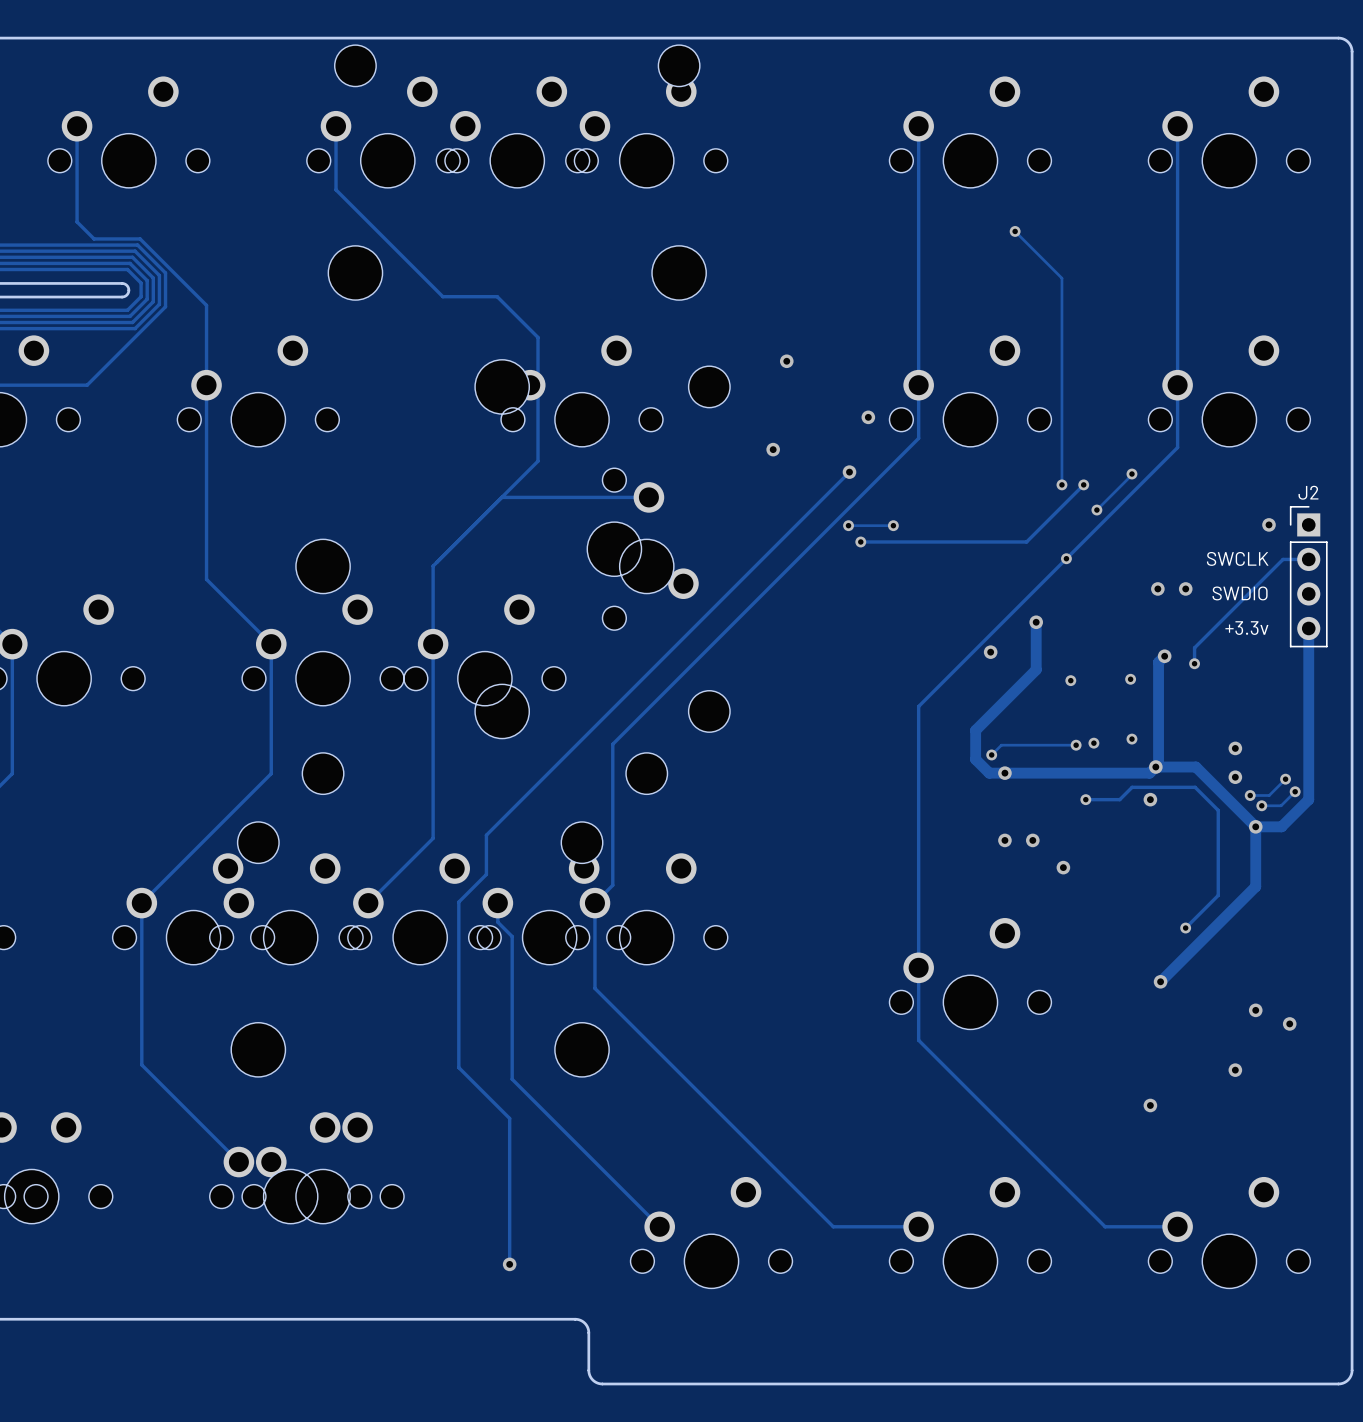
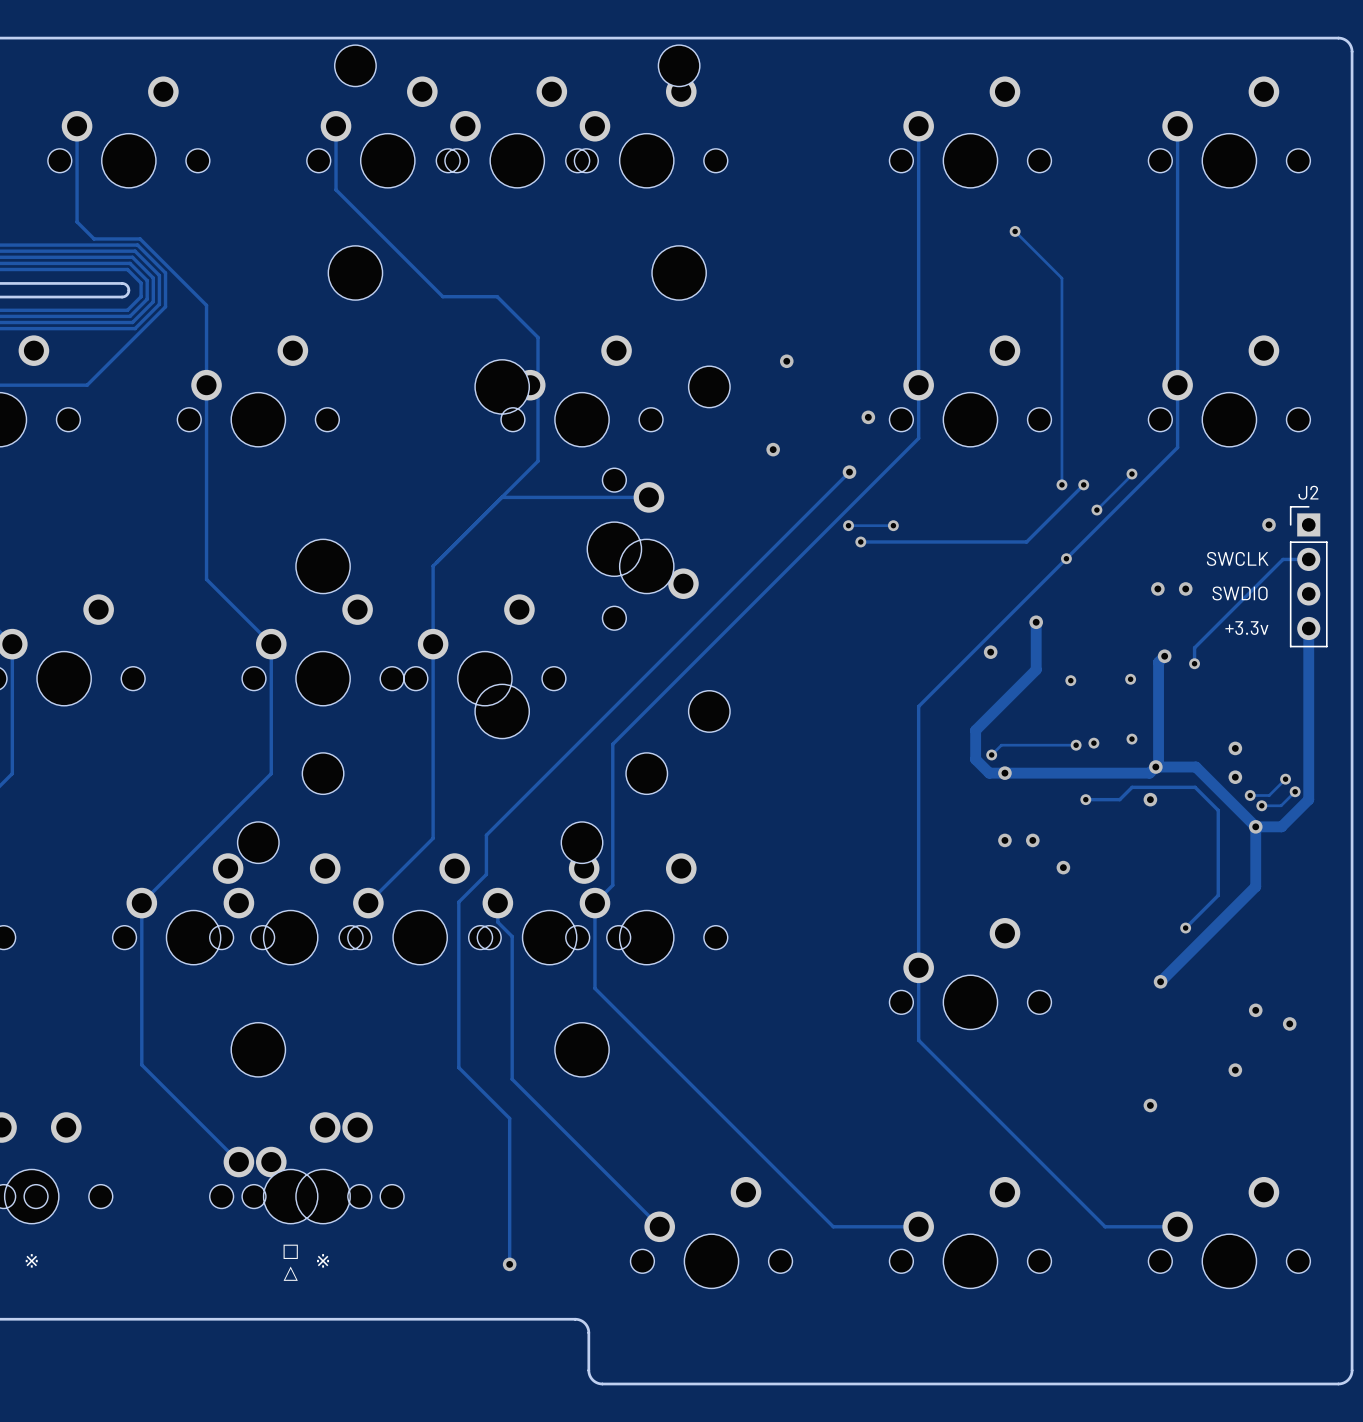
text: none -> □ (290, 1251)
text: none -> ※ (31, 1260)
text: none -> ※ (323, 1260)
text: none -> △ (290, 1273)

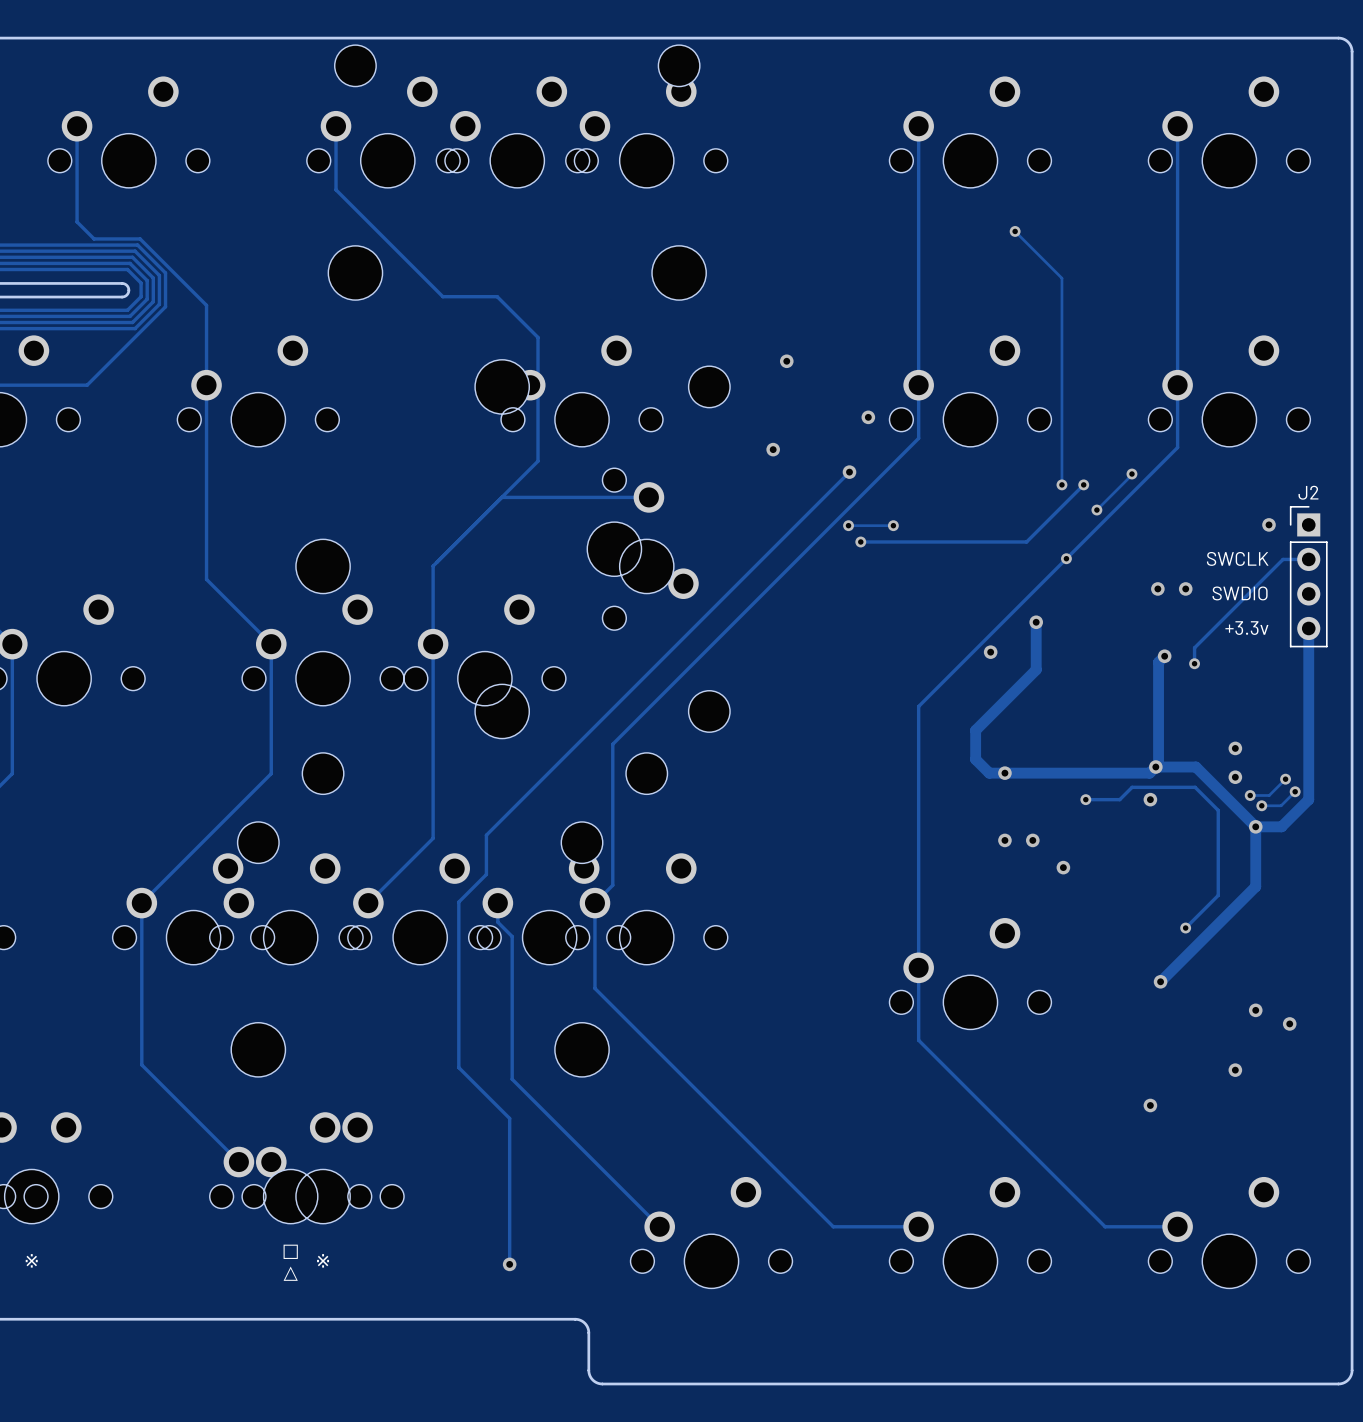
via: (1130, 679) -> none
via: (1070, 680) -> none
via: (1131, 739) -> none
via: (1093, 743) -> none
track: (1076, 745) (1001, 745) (991, 754) -> none
via: (1076, 745) -> none
via: (991, 754) -> none

